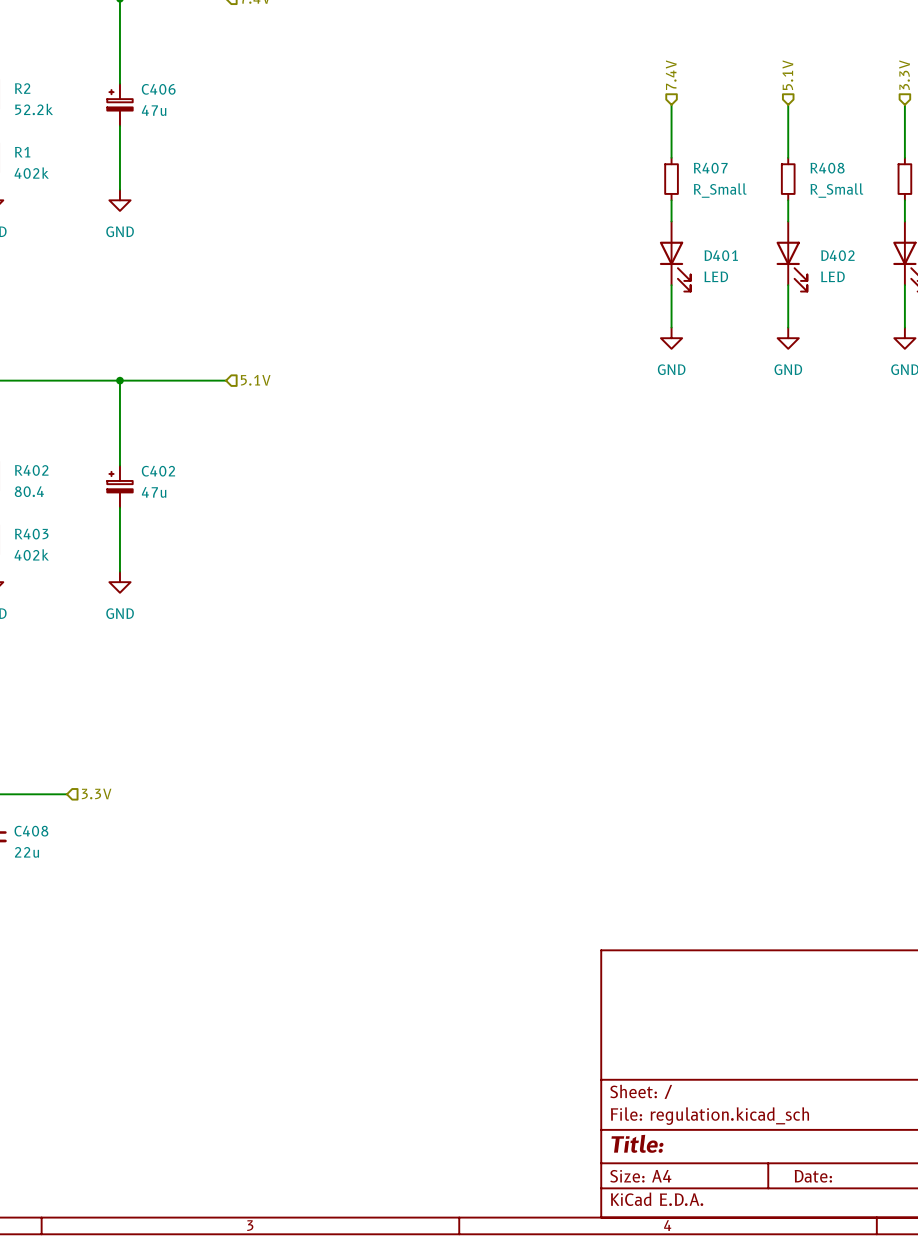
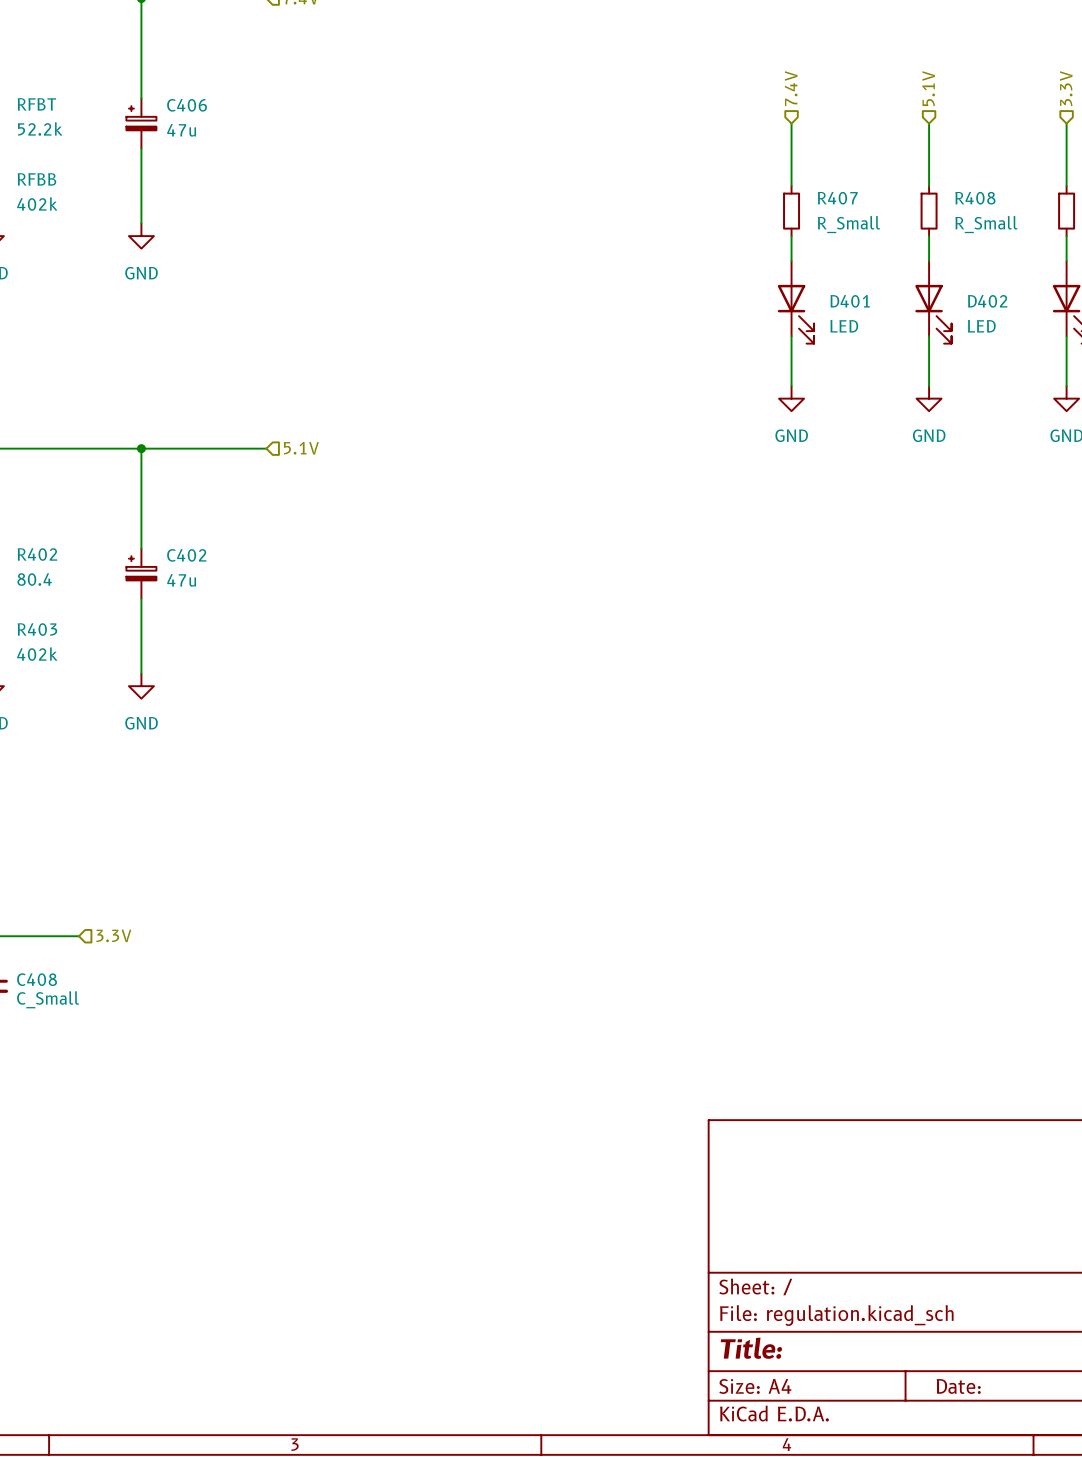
R2 name: R2 (22, 88) -> RFBT (36, 104)
R1 name: R1 (22, 152) -> RFBB (36, 179)
C408 value: 22u (27, 852) -> C_Small (48, 999)

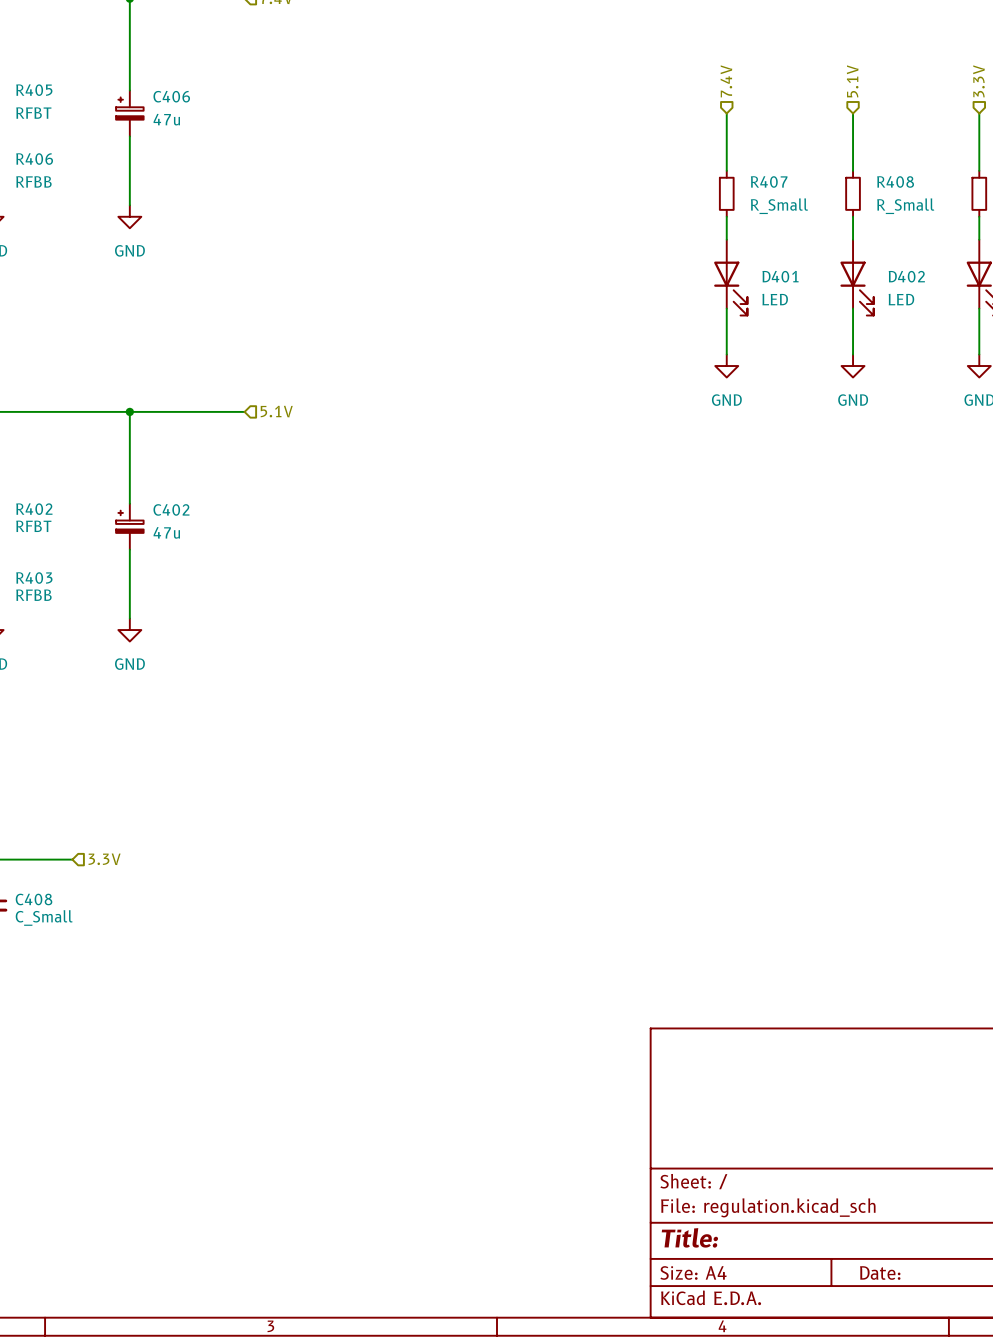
RFBT name: RFBT (36, 104) -> R405 (34, 90)
RFBT value: 52.2k (40, 129) -> RFBT (33, 113)
RFBB name: RFBB (36, 179) -> R406 (34, 159)
RFBB value: 402k (37, 204) -> RFBB (33, 181)
R402 value: 80.4 (34, 579) -> RFBT (33, 526)
R403 value: 402k (37, 654) -> RFBB (33, 595)

